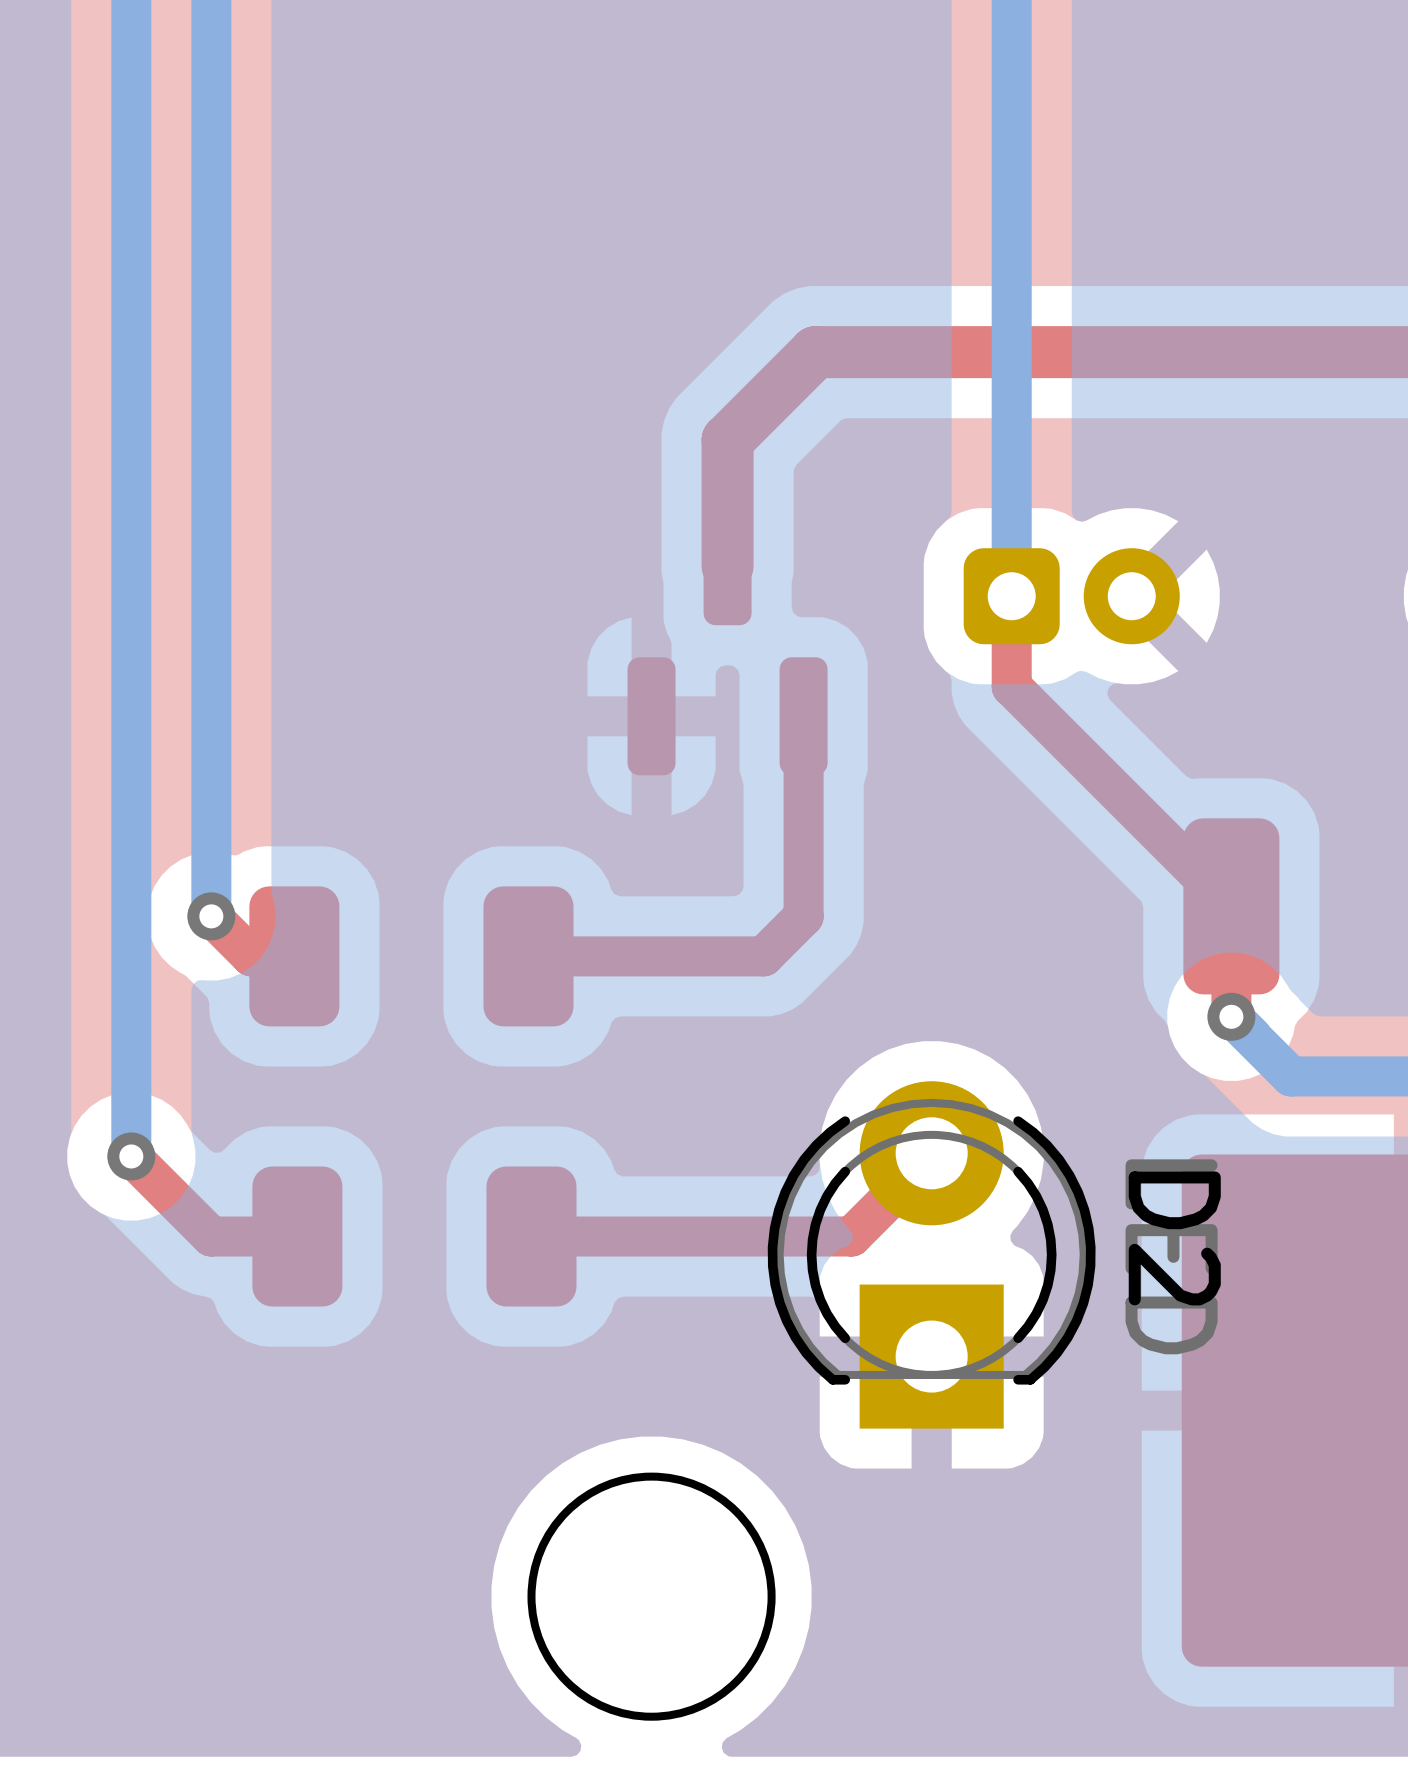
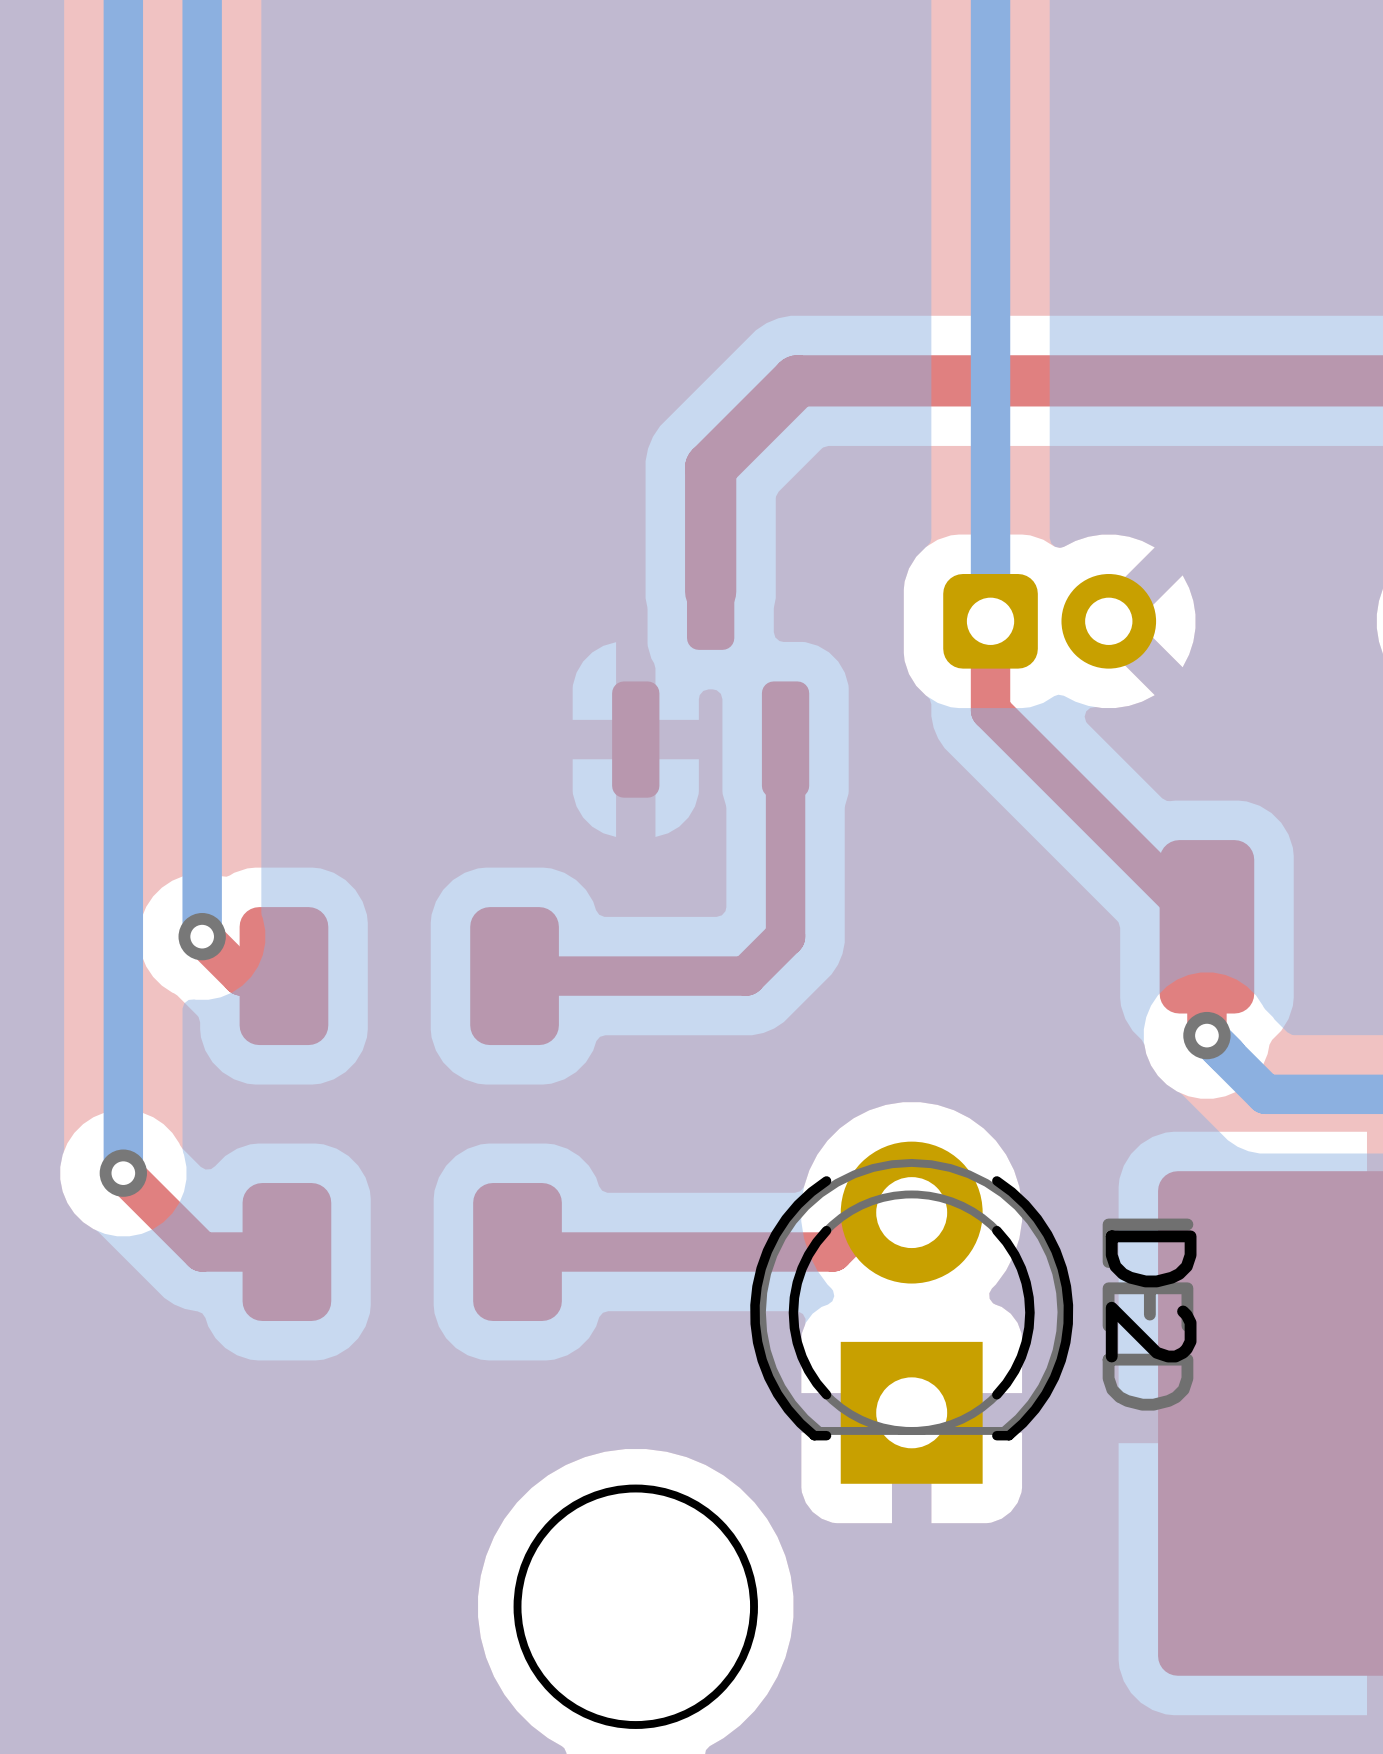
D2 position: (931, 1254) -> (911, 1312)

